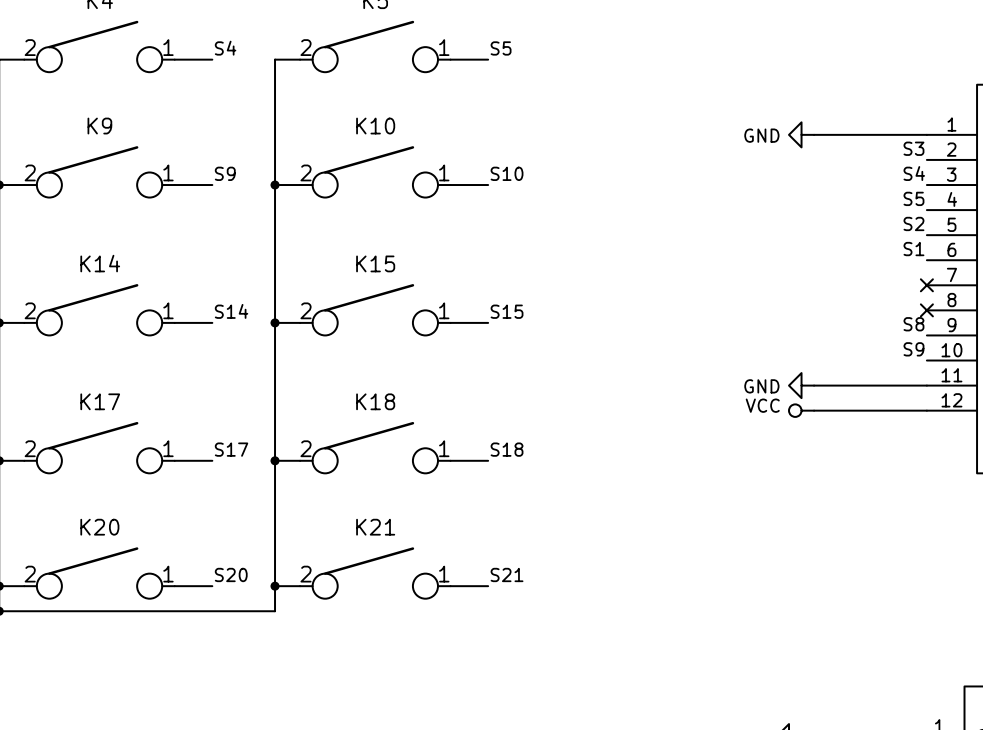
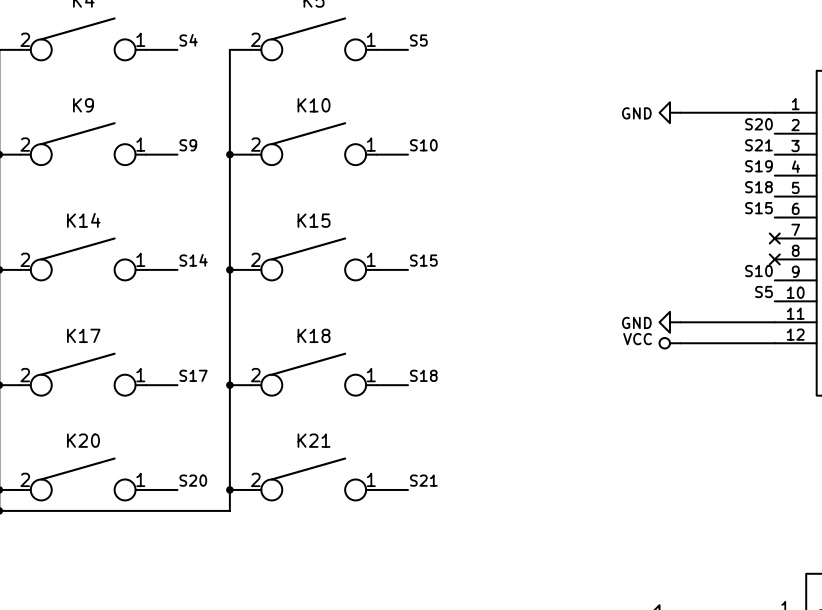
label: S3 (913, 148) -> S20 (758, 124)
label: S4 (914, 173) -> S21 (758, 145)
label: S5 (913, 198) -> S19 (758, 166)
label: S2 (913, 223) -> S18 (758, 187)
label: S1 (913, 249) -> S15 (758, 208)
label: S8 (913, 324) -> S10 (758, 271)
label: S9 (913, 349) -> S5 (763, 291)

